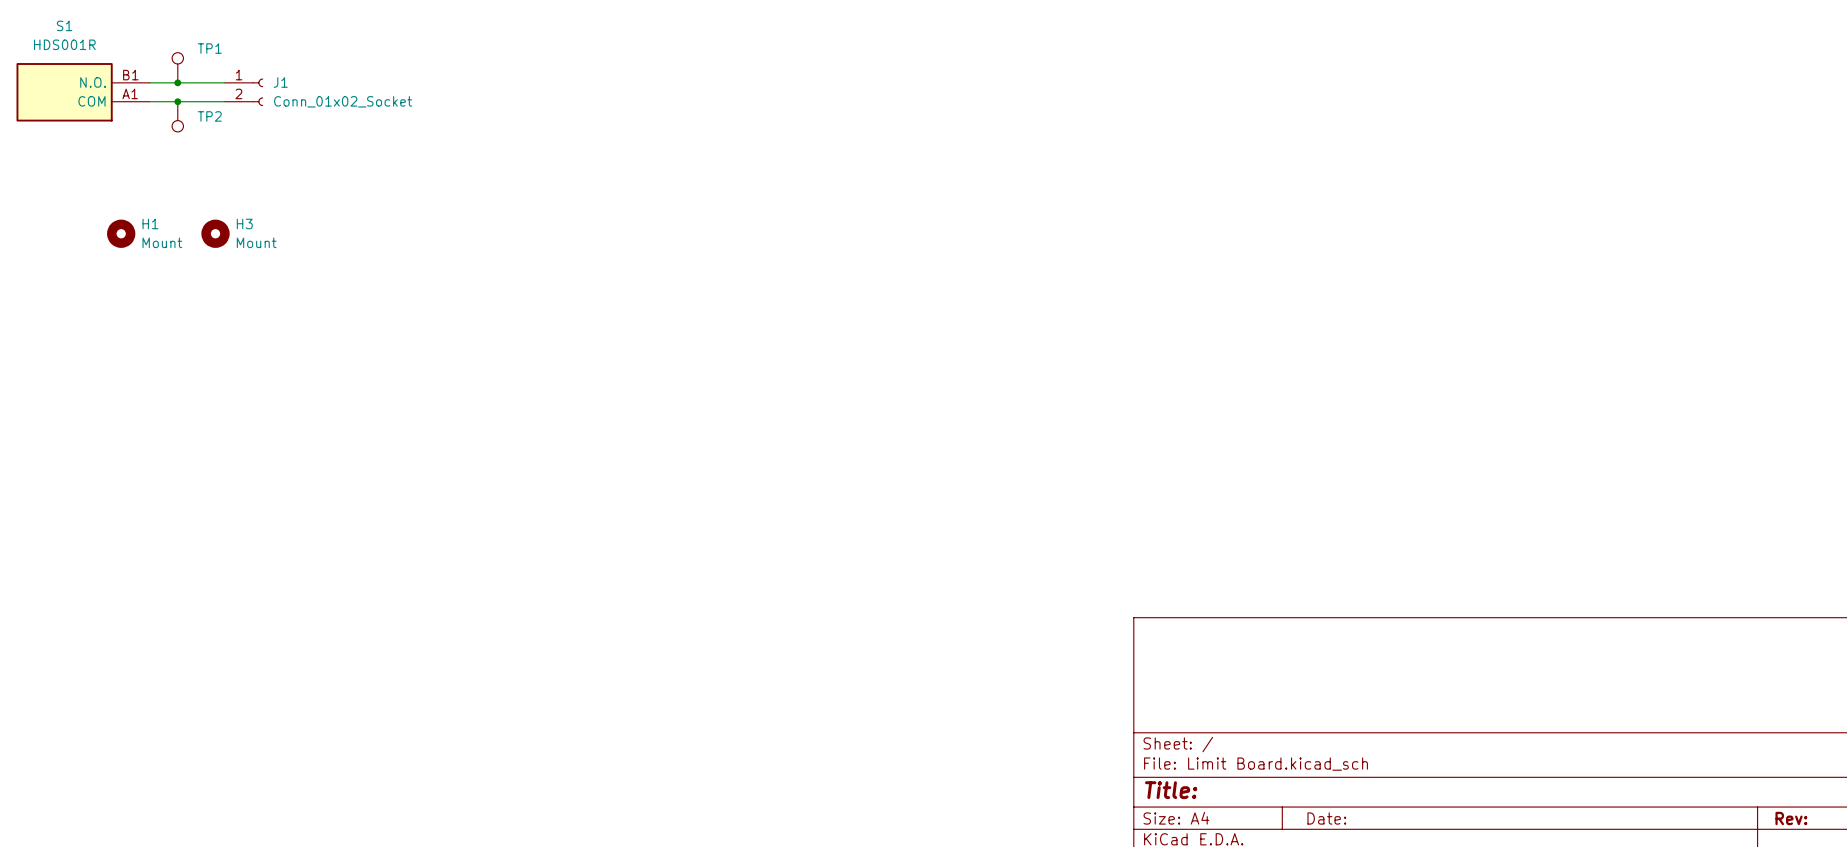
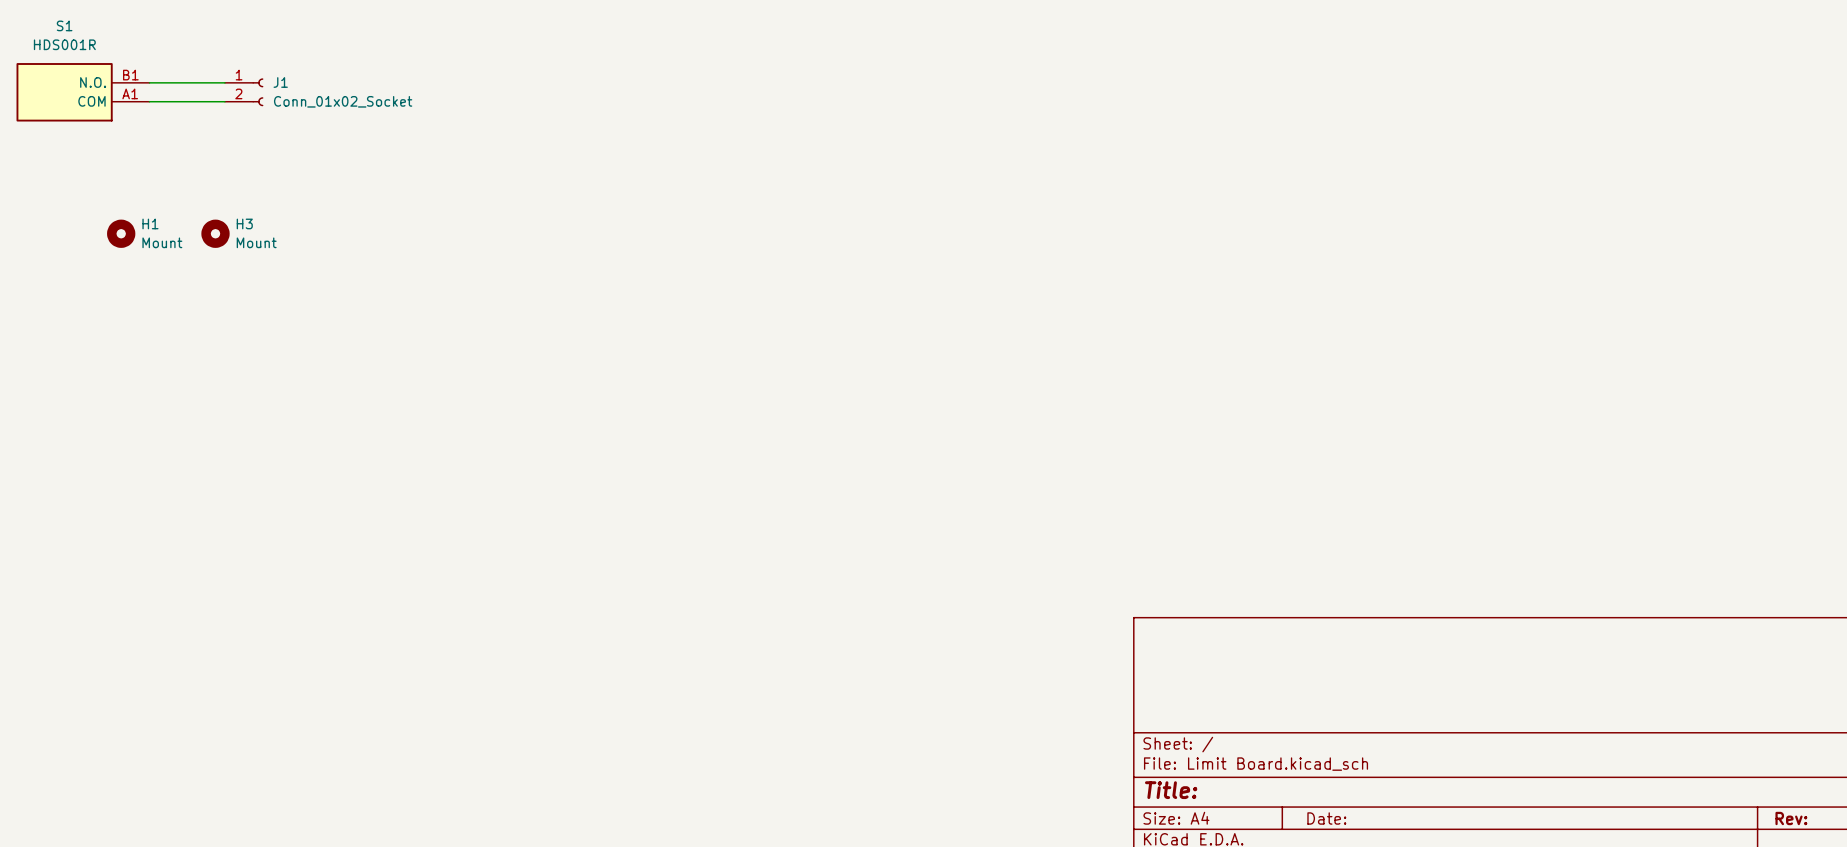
TP1: (177, 67) -> none
junction: (177, 82) -> none
junction: (177, 101) -> none
TP2: (177, 116) -> none

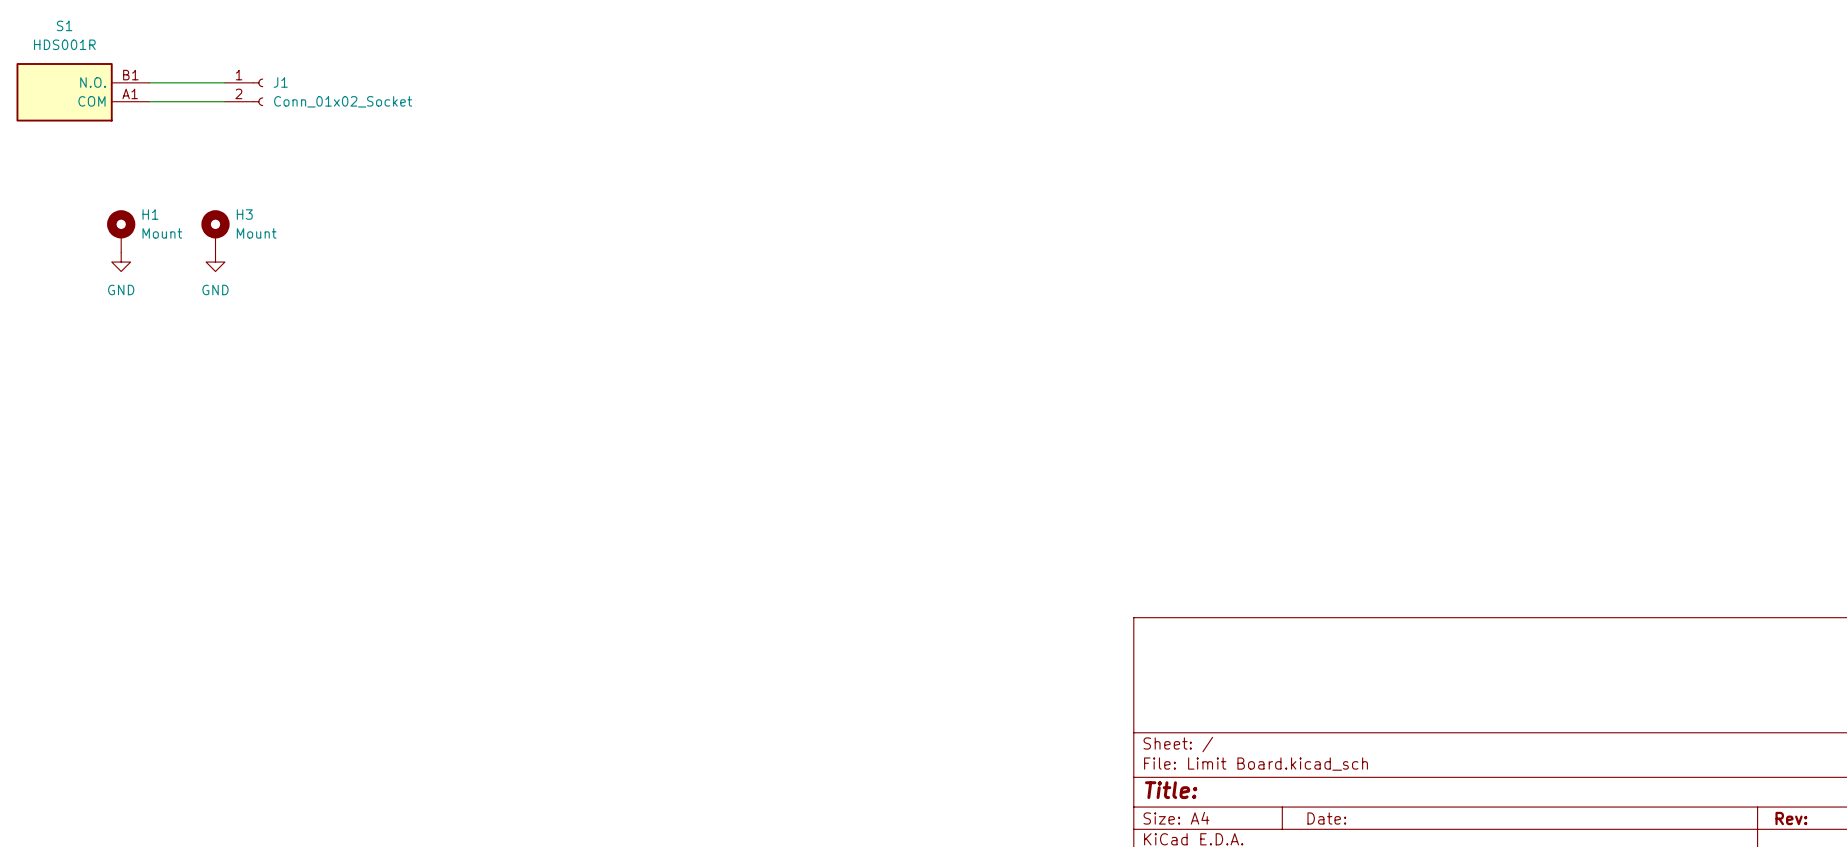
H1 symbol: [107, 219, 136, 248] -> [107, 210, 136, 253]
H3 symbol: [201, 219, 230, 248] -> [201, 210, 230, 253]
power symbol: none -> GND (121, 262)
power symbol: none -> GND (215, 262)

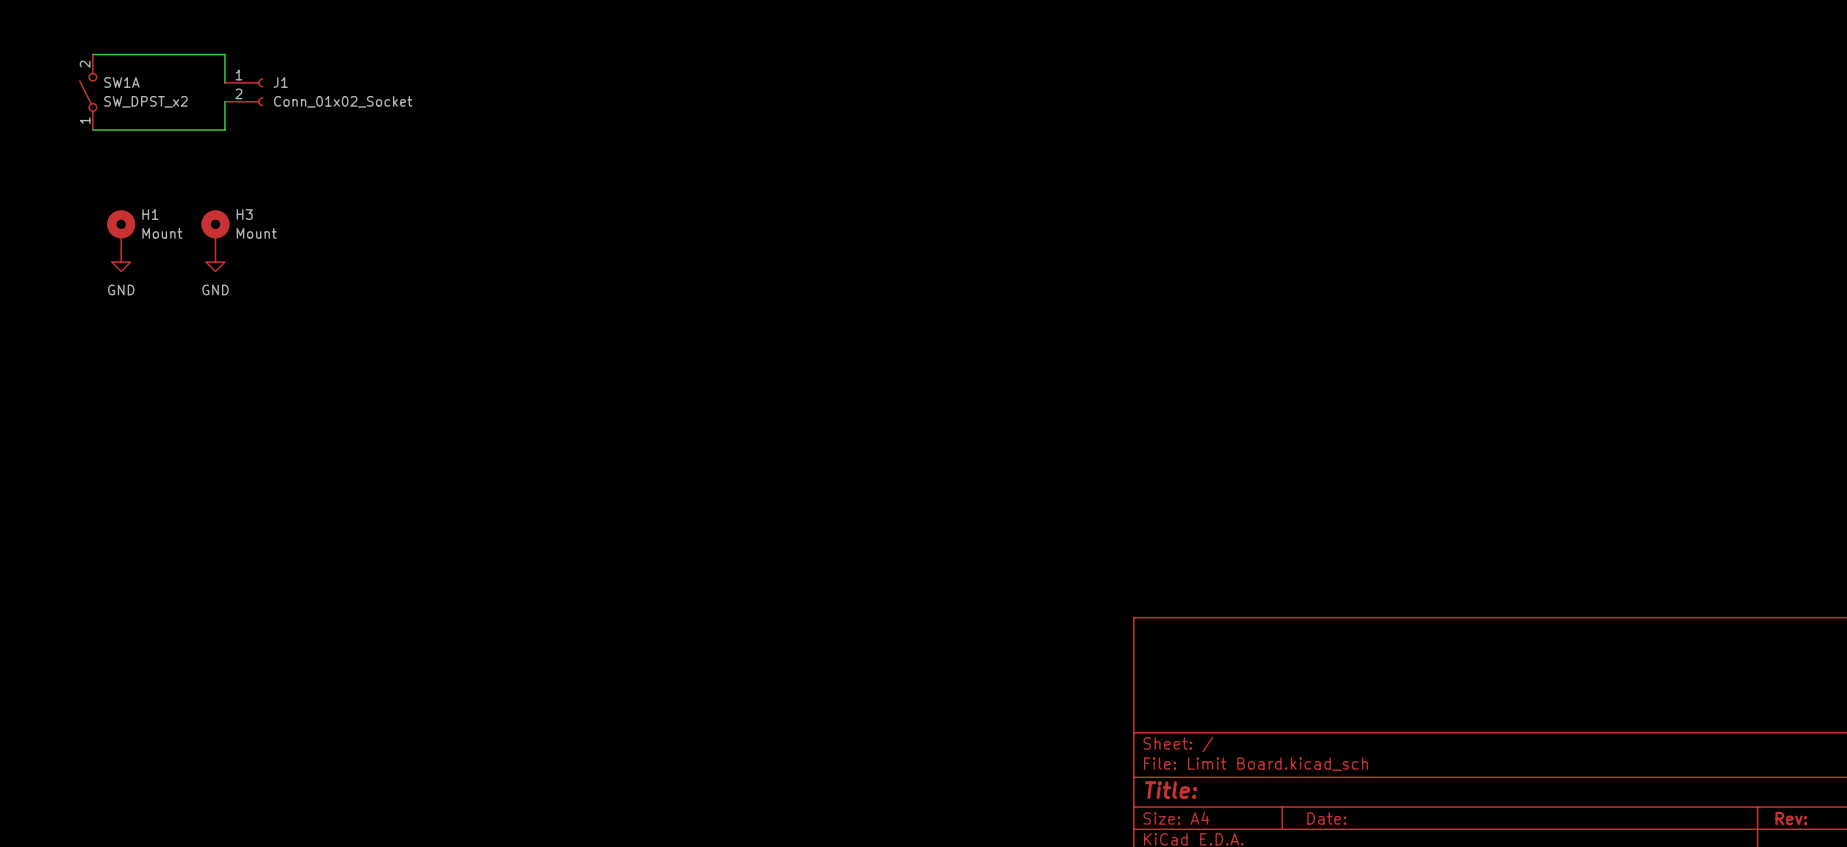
wire: (149, 82) (224, 82) -> (92, 54) (224, 54) (224, 82)
S1: HDS001R (83, 92) -> none
SW1A: none -> SW_DPST_x2 (88, 92)
wire: (149, 101) (224, 101) -> (92, 130) (224, 130) (224, 101)

